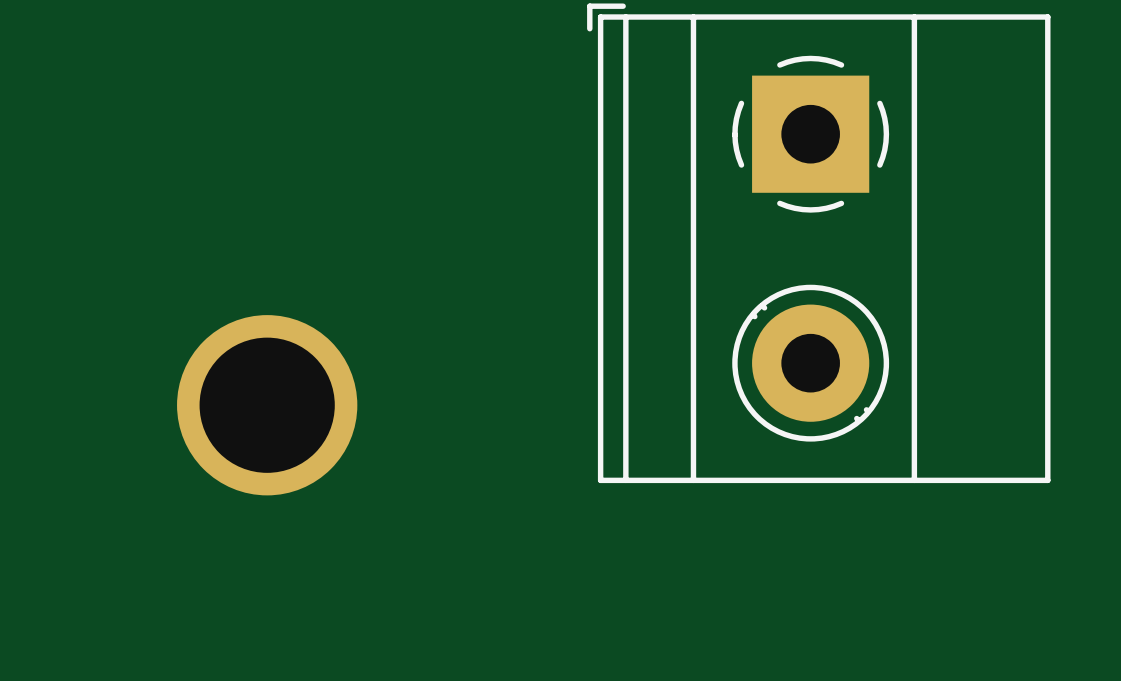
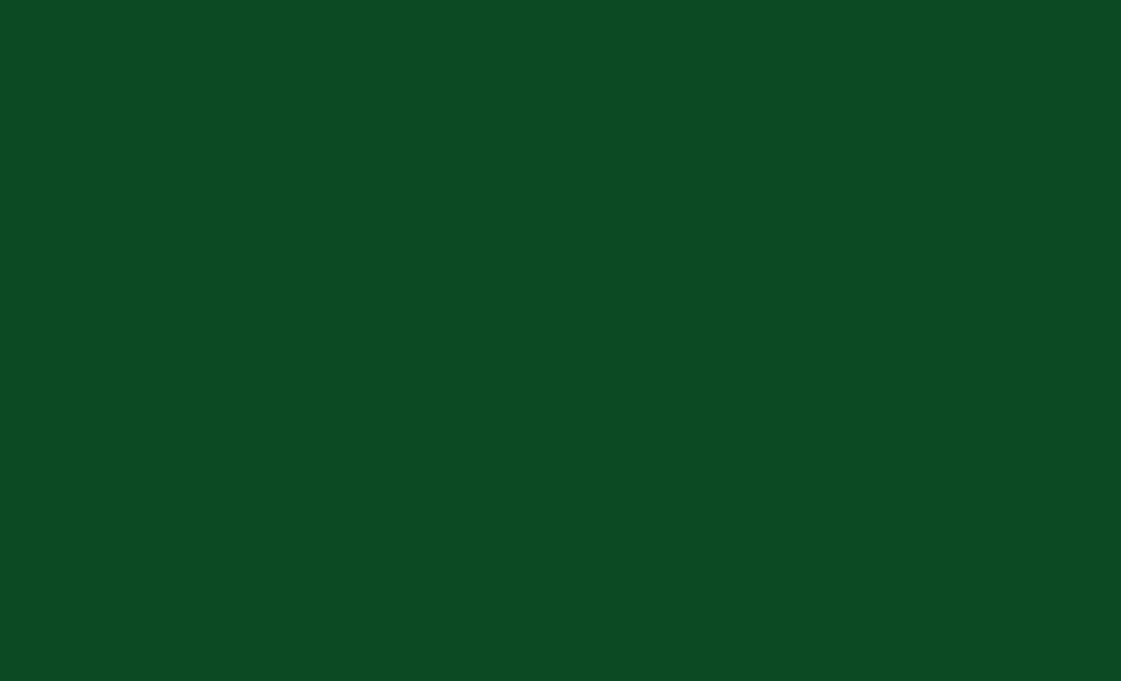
part: (818, 243) -> none
part: (267, 405) -> none

